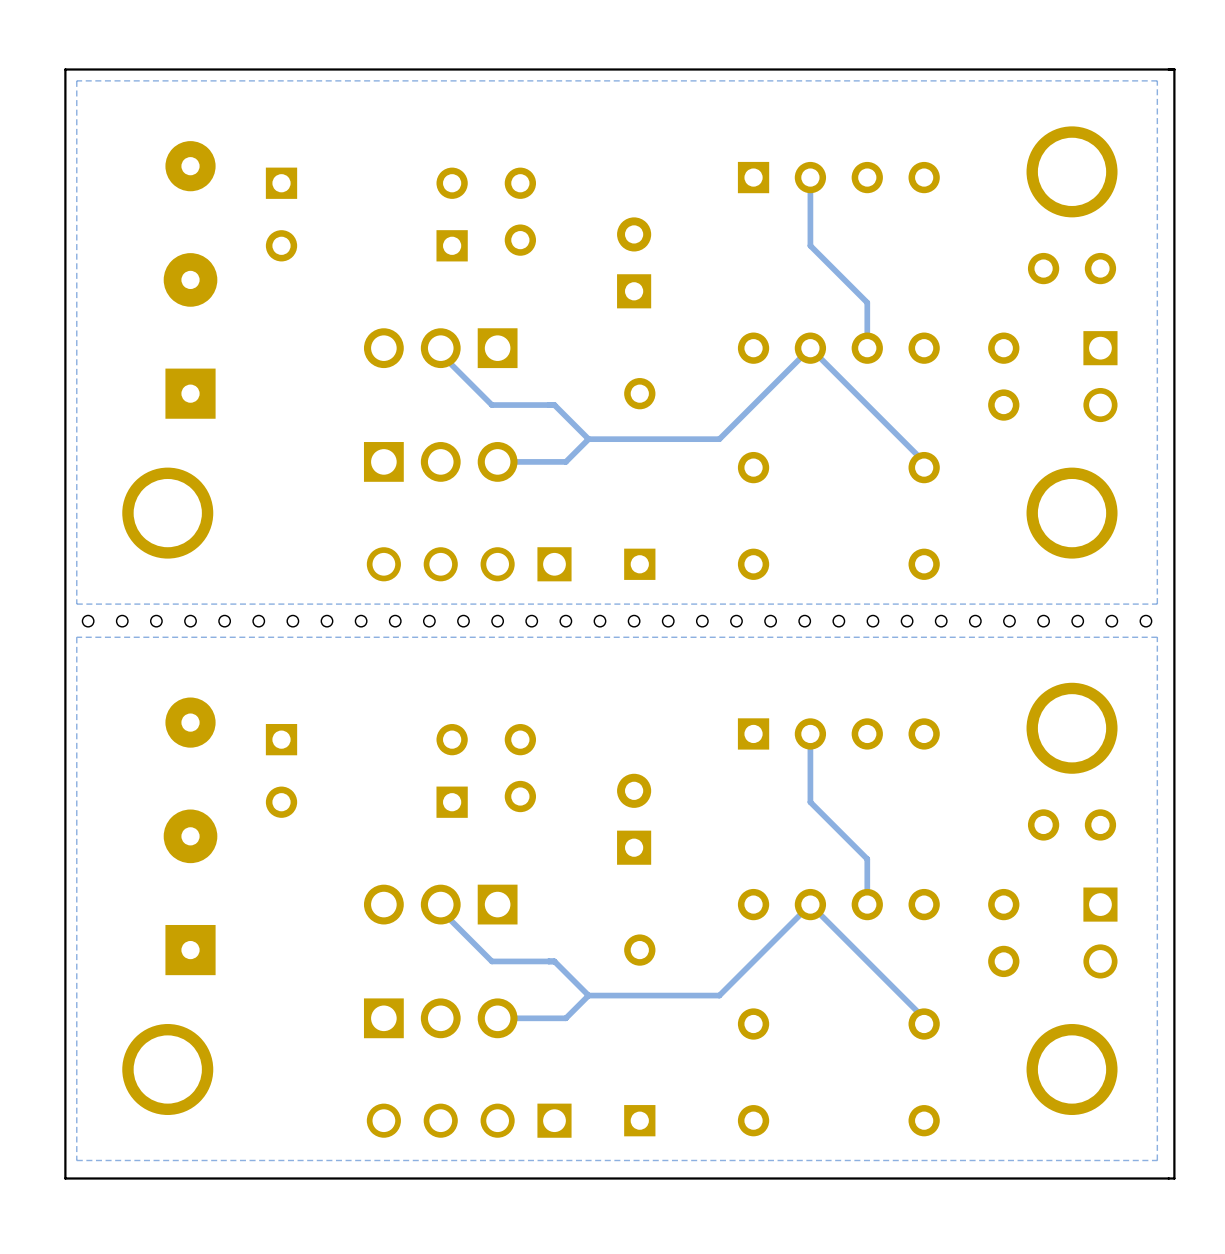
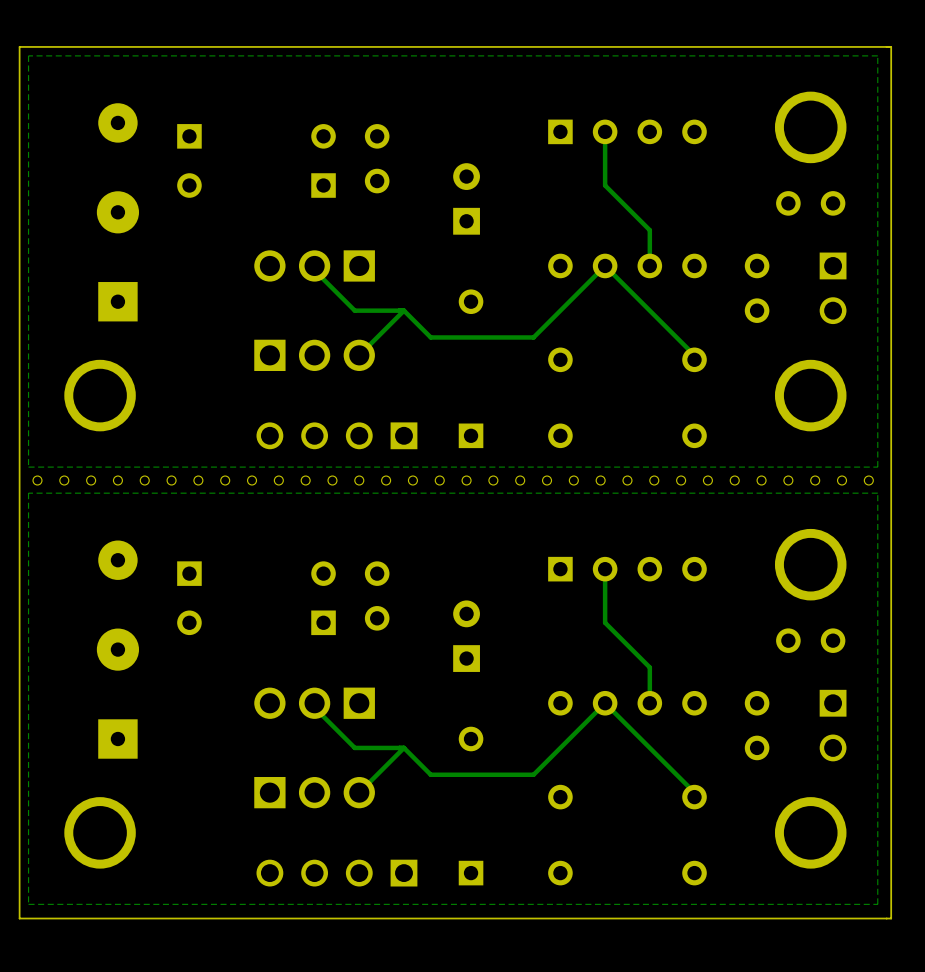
track: (588, 439) (565, 461) (497, 461) -> (403, 310) (359, 355)
track: (588, 995) (565, 1018) (497, 1018) -> (403, 747) (359, 792)

